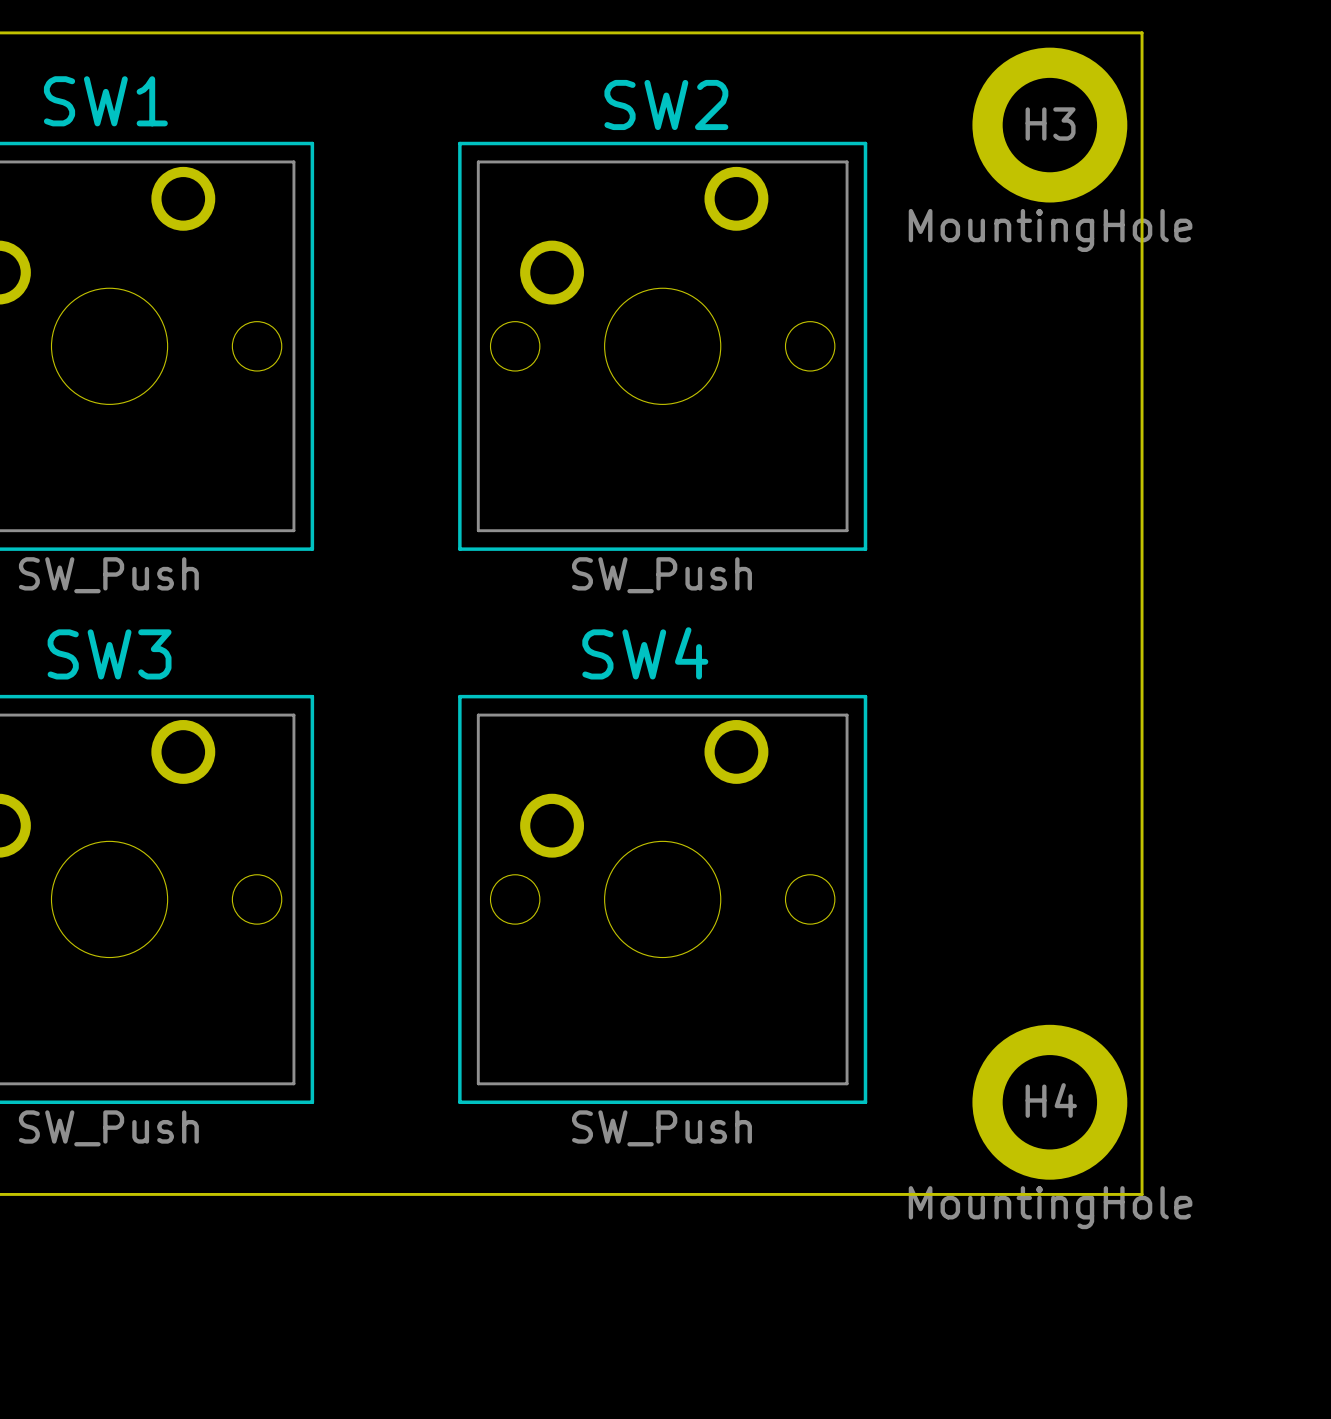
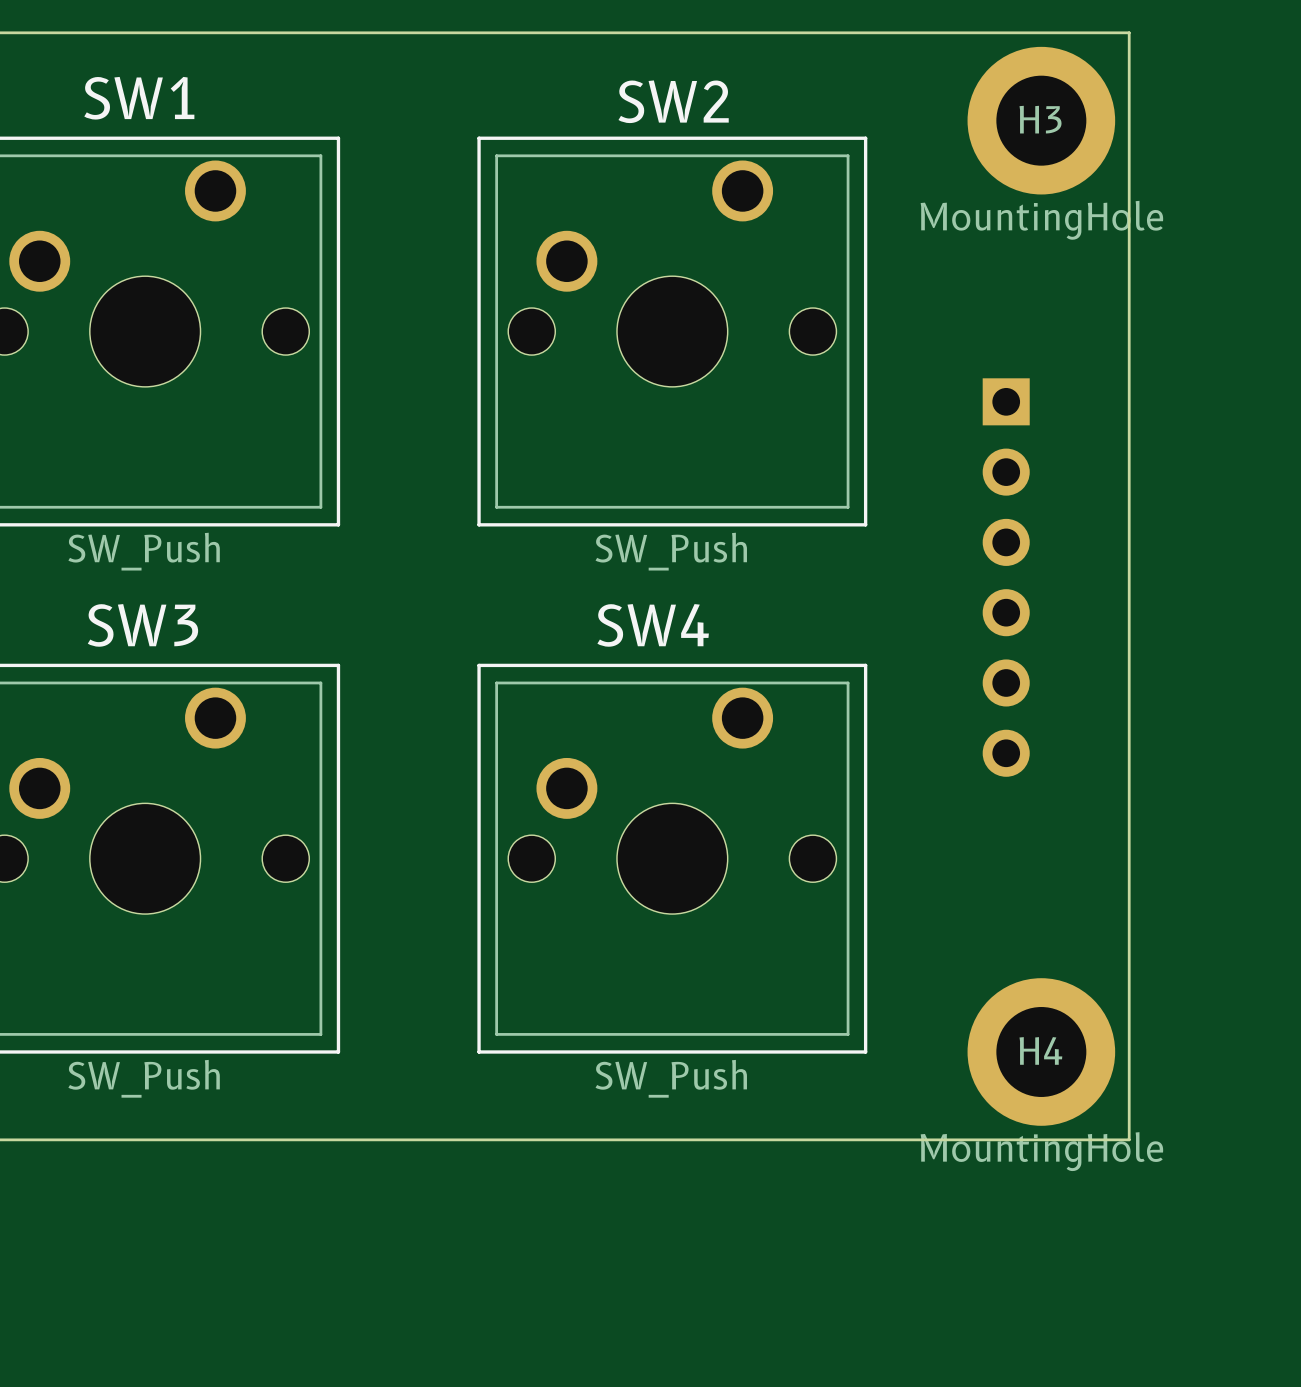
part: none -> (1006, 577)

